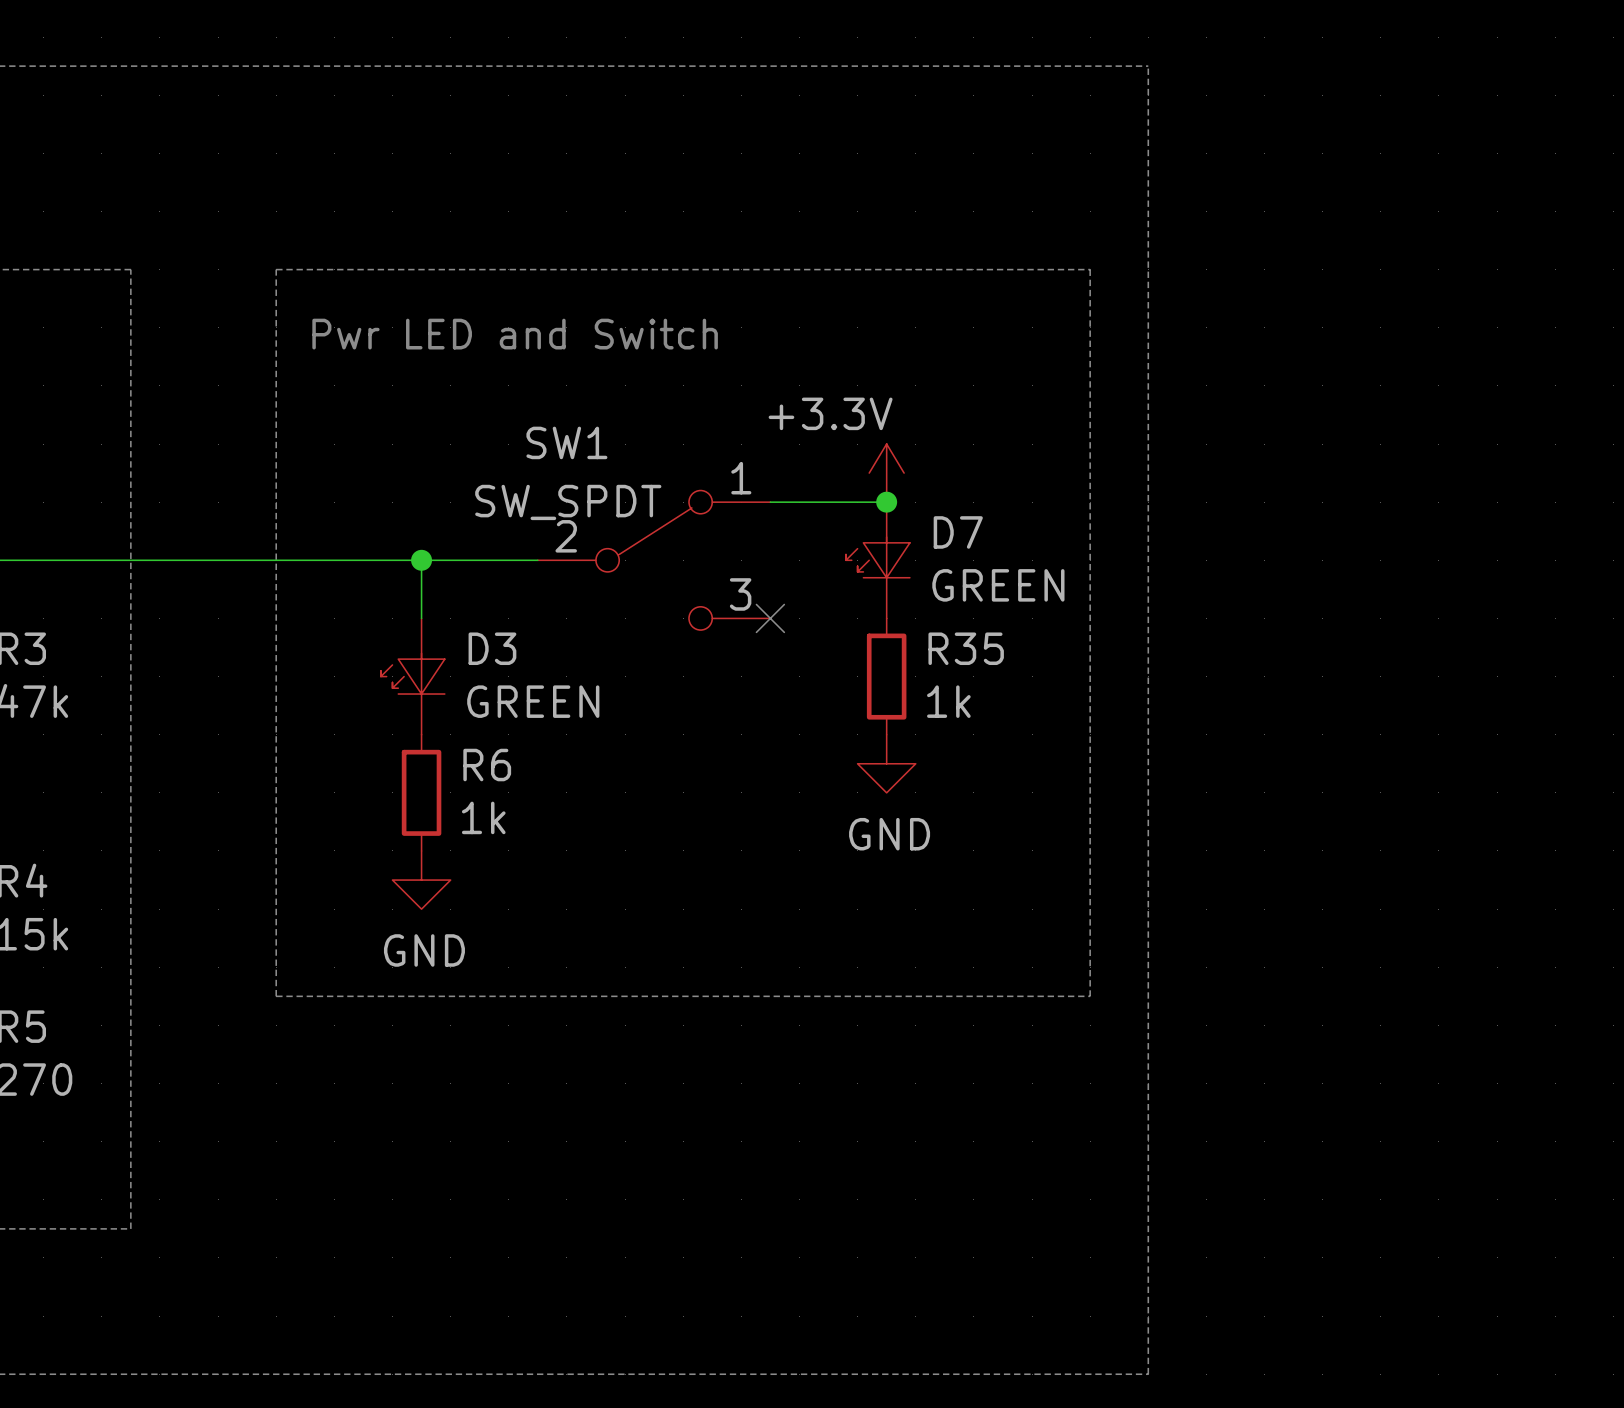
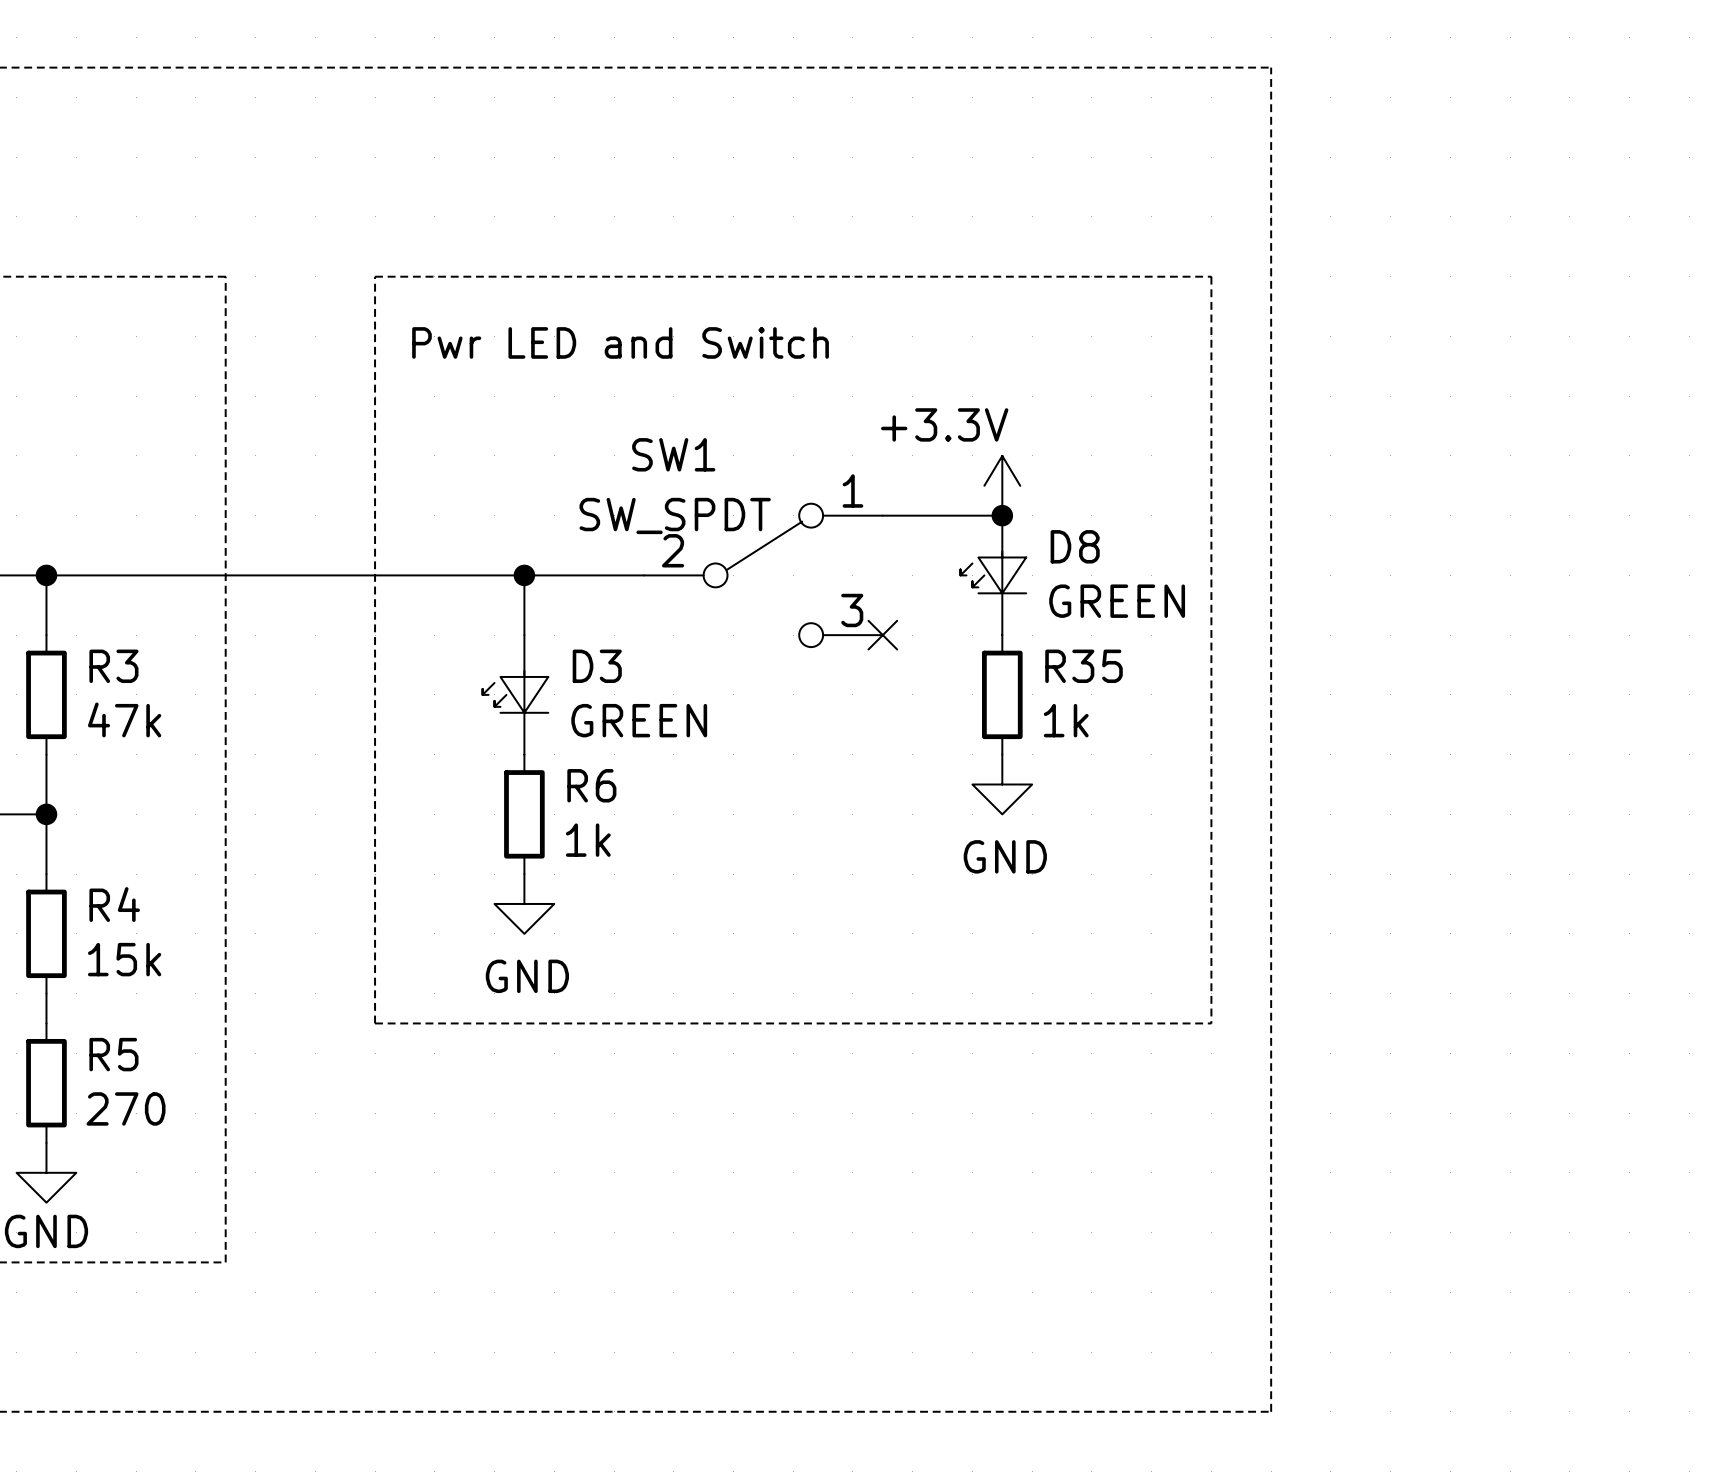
D7 name: D7 (958, 532) -> D8 (1075, 546)

